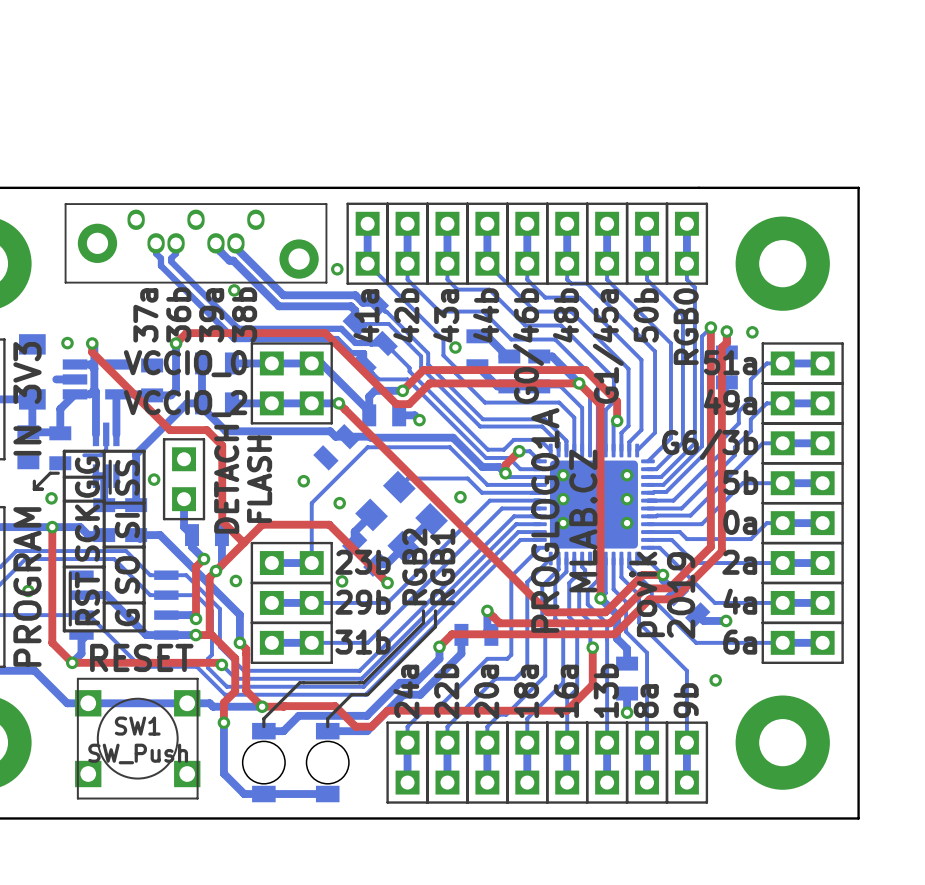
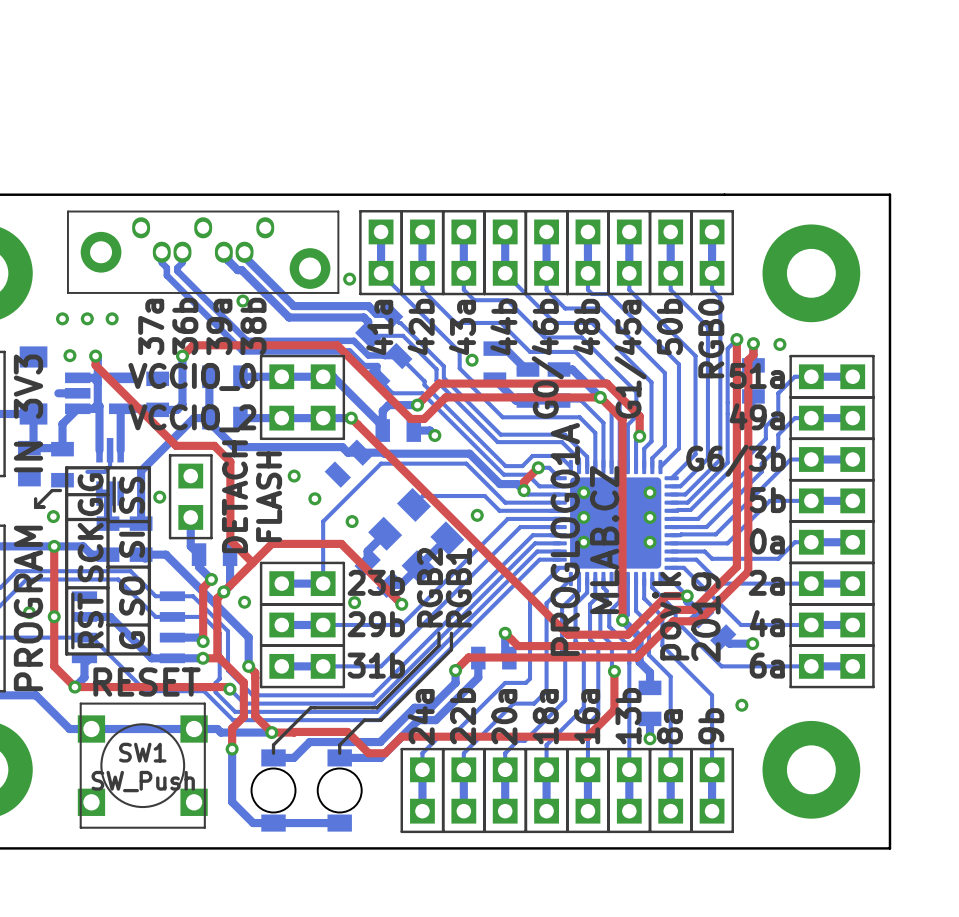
via: none -> (62, 318)
via: none -> (87, 318)
via: none -> (112, 318)
via: none -> (294, 476)
via: none -> (54, 616)

